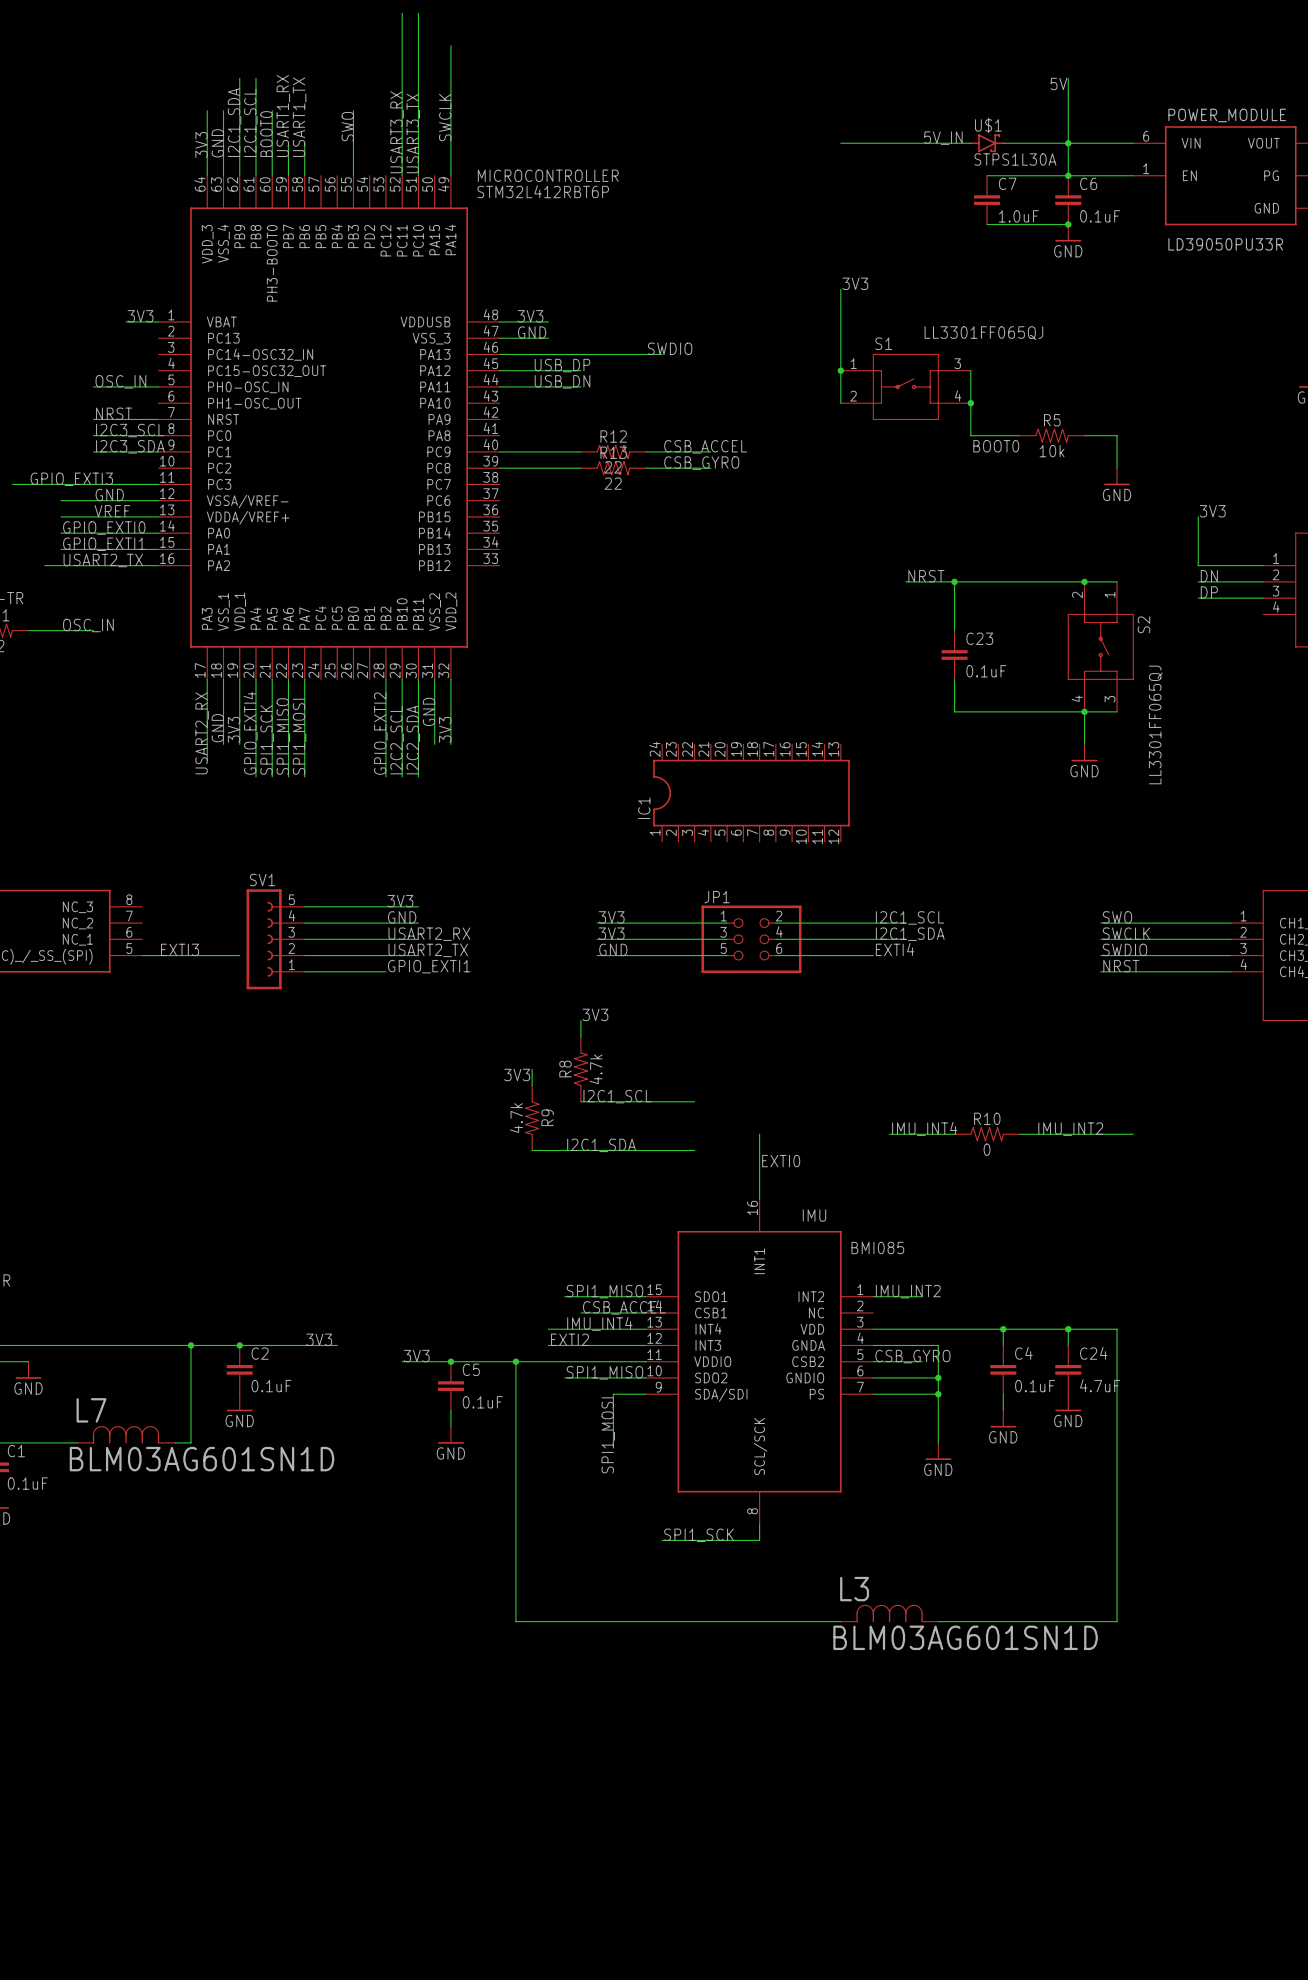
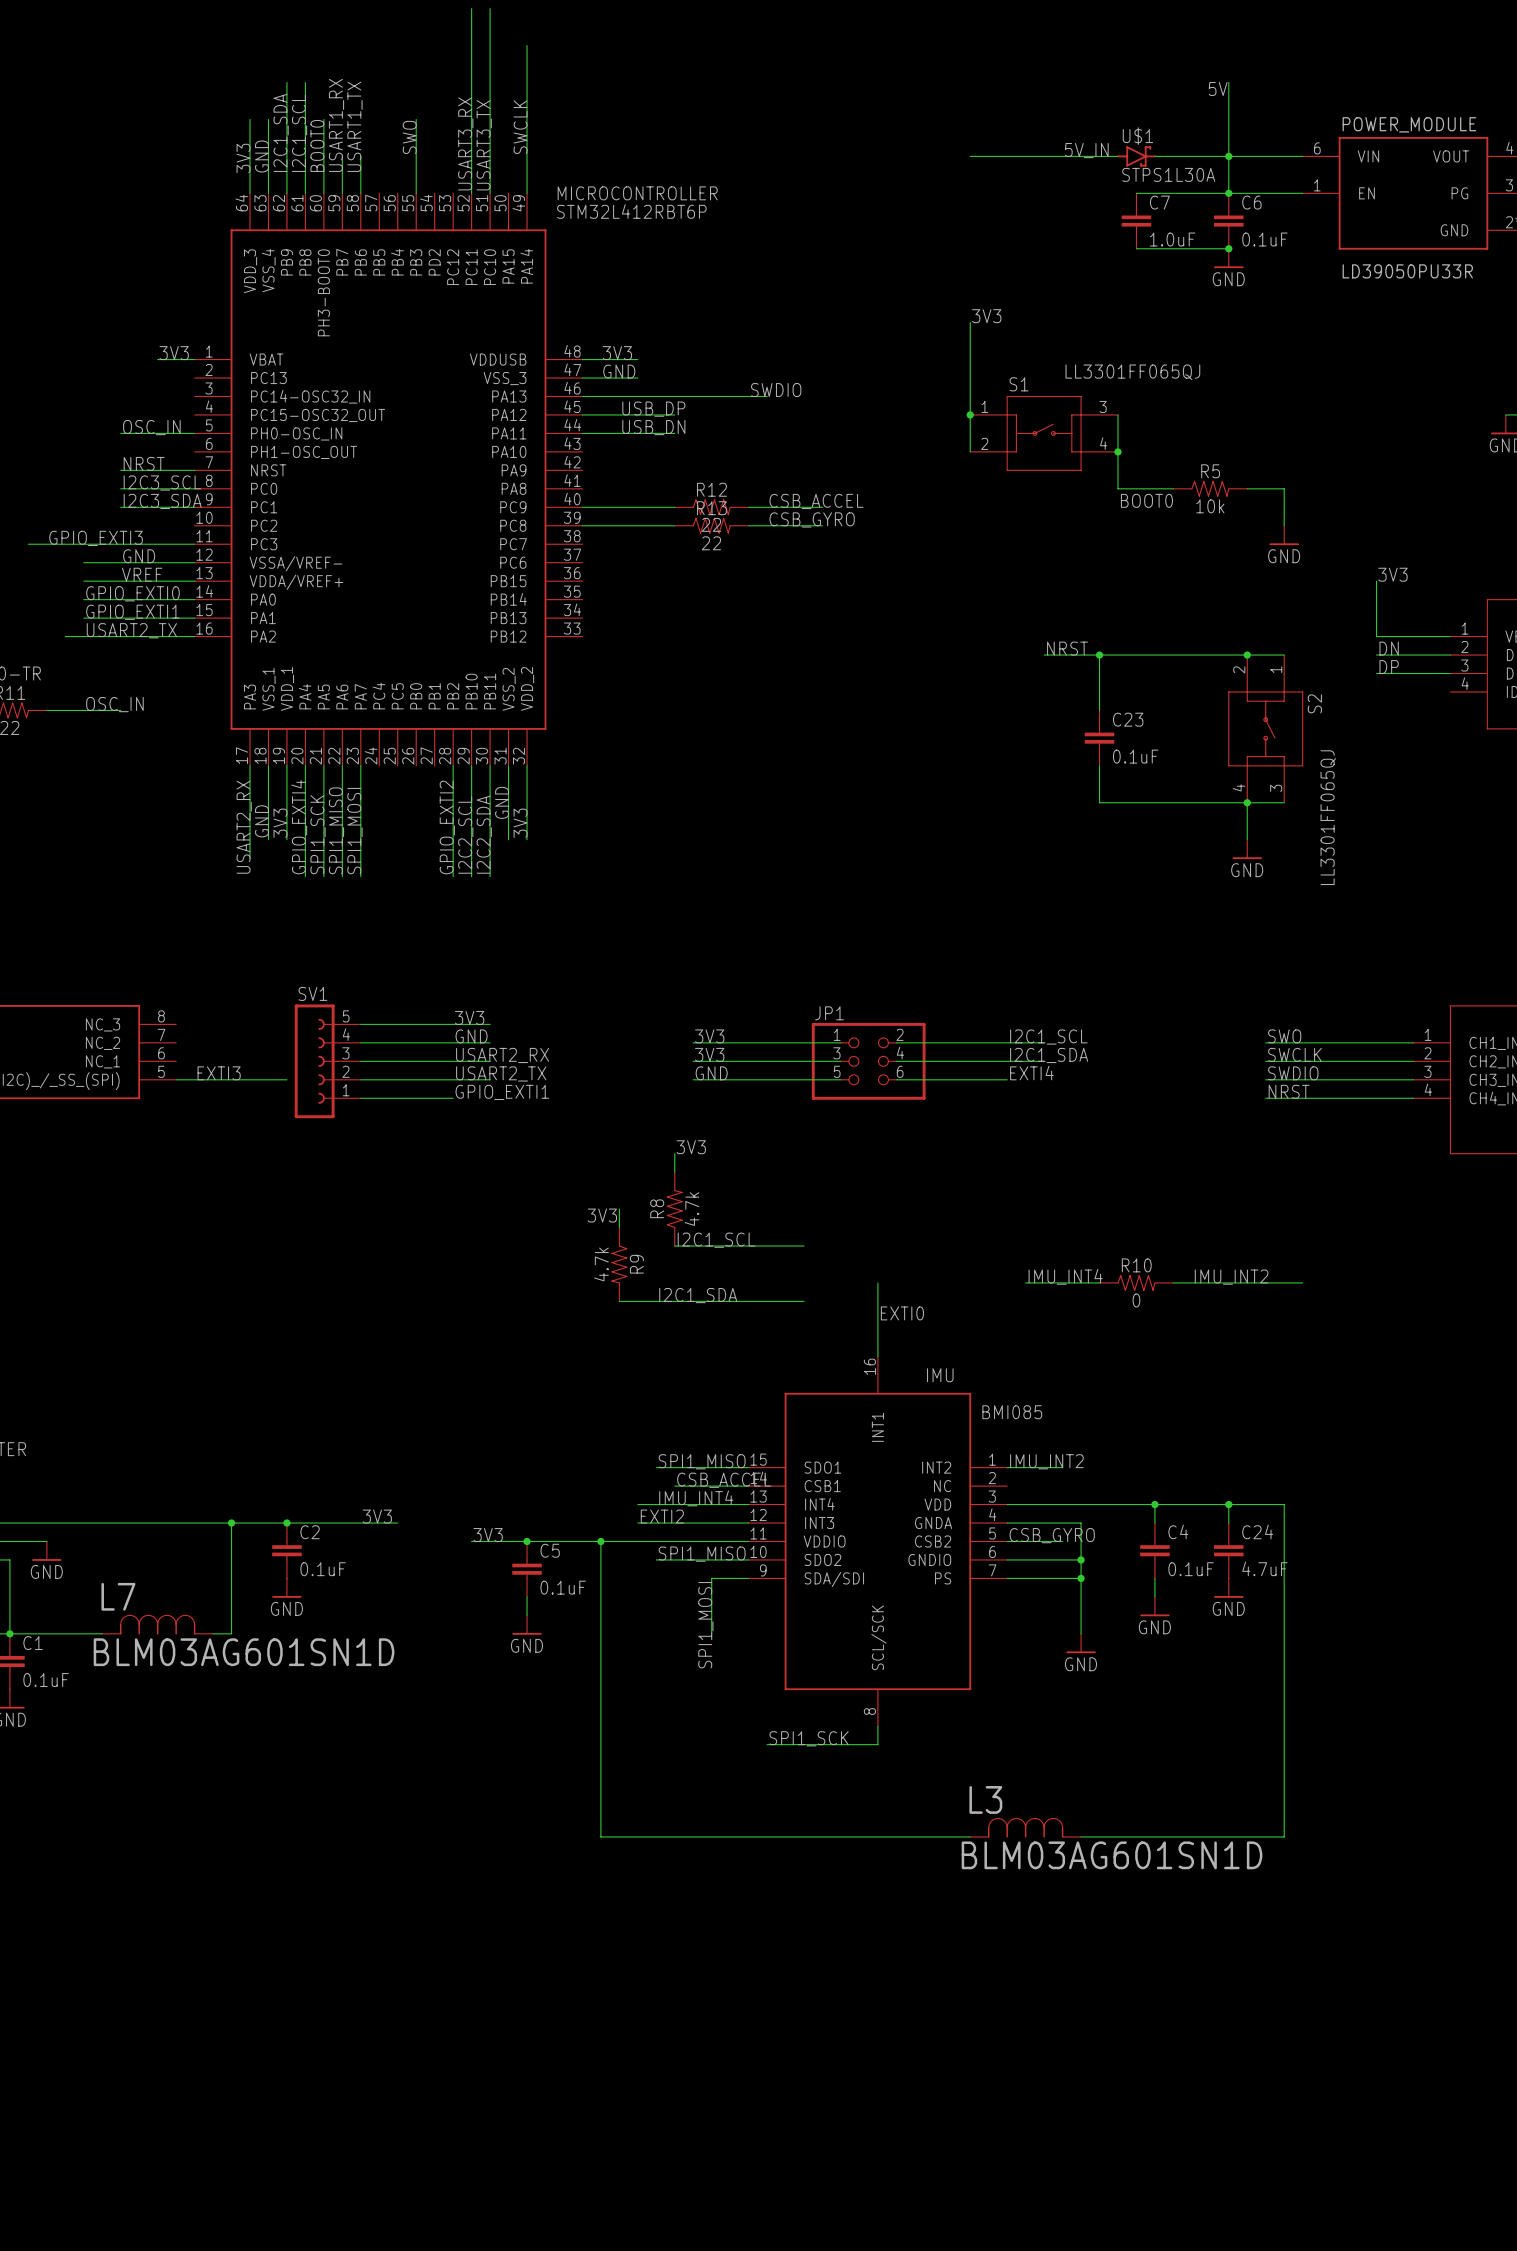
IC1: (751, 793) -> none

